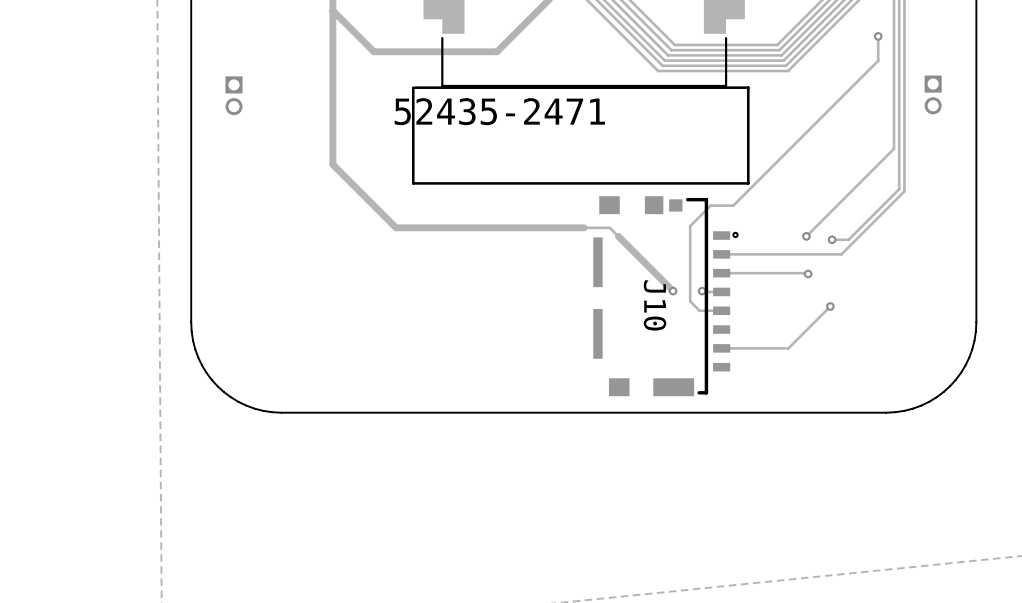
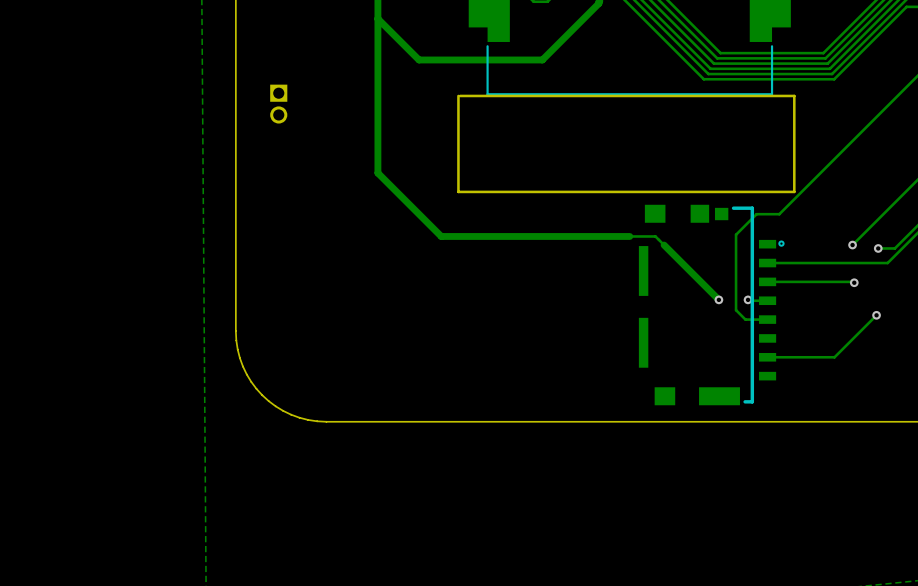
part value: 52435-2471 (499, 111) -> none
J10 name: J10 (655, 305) -> none

